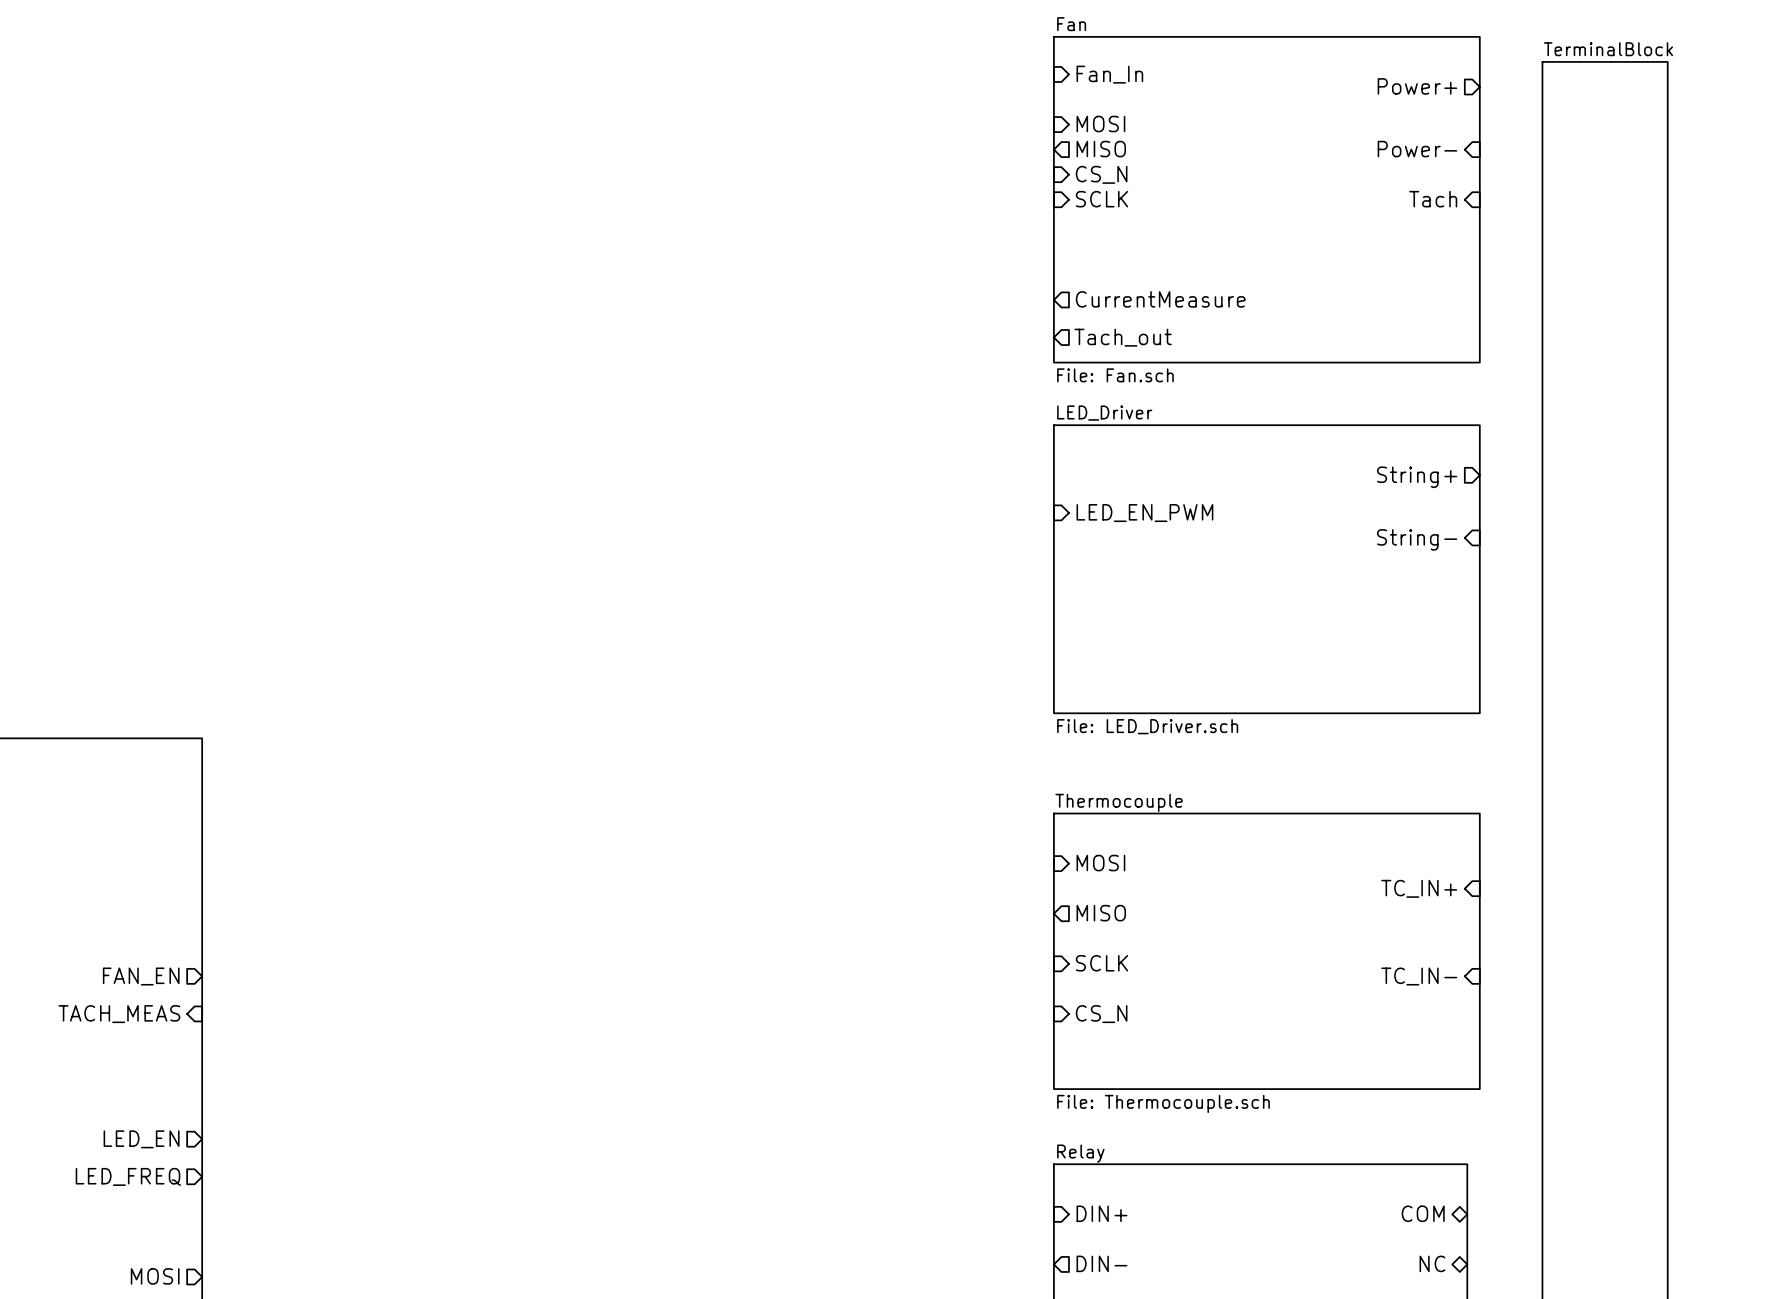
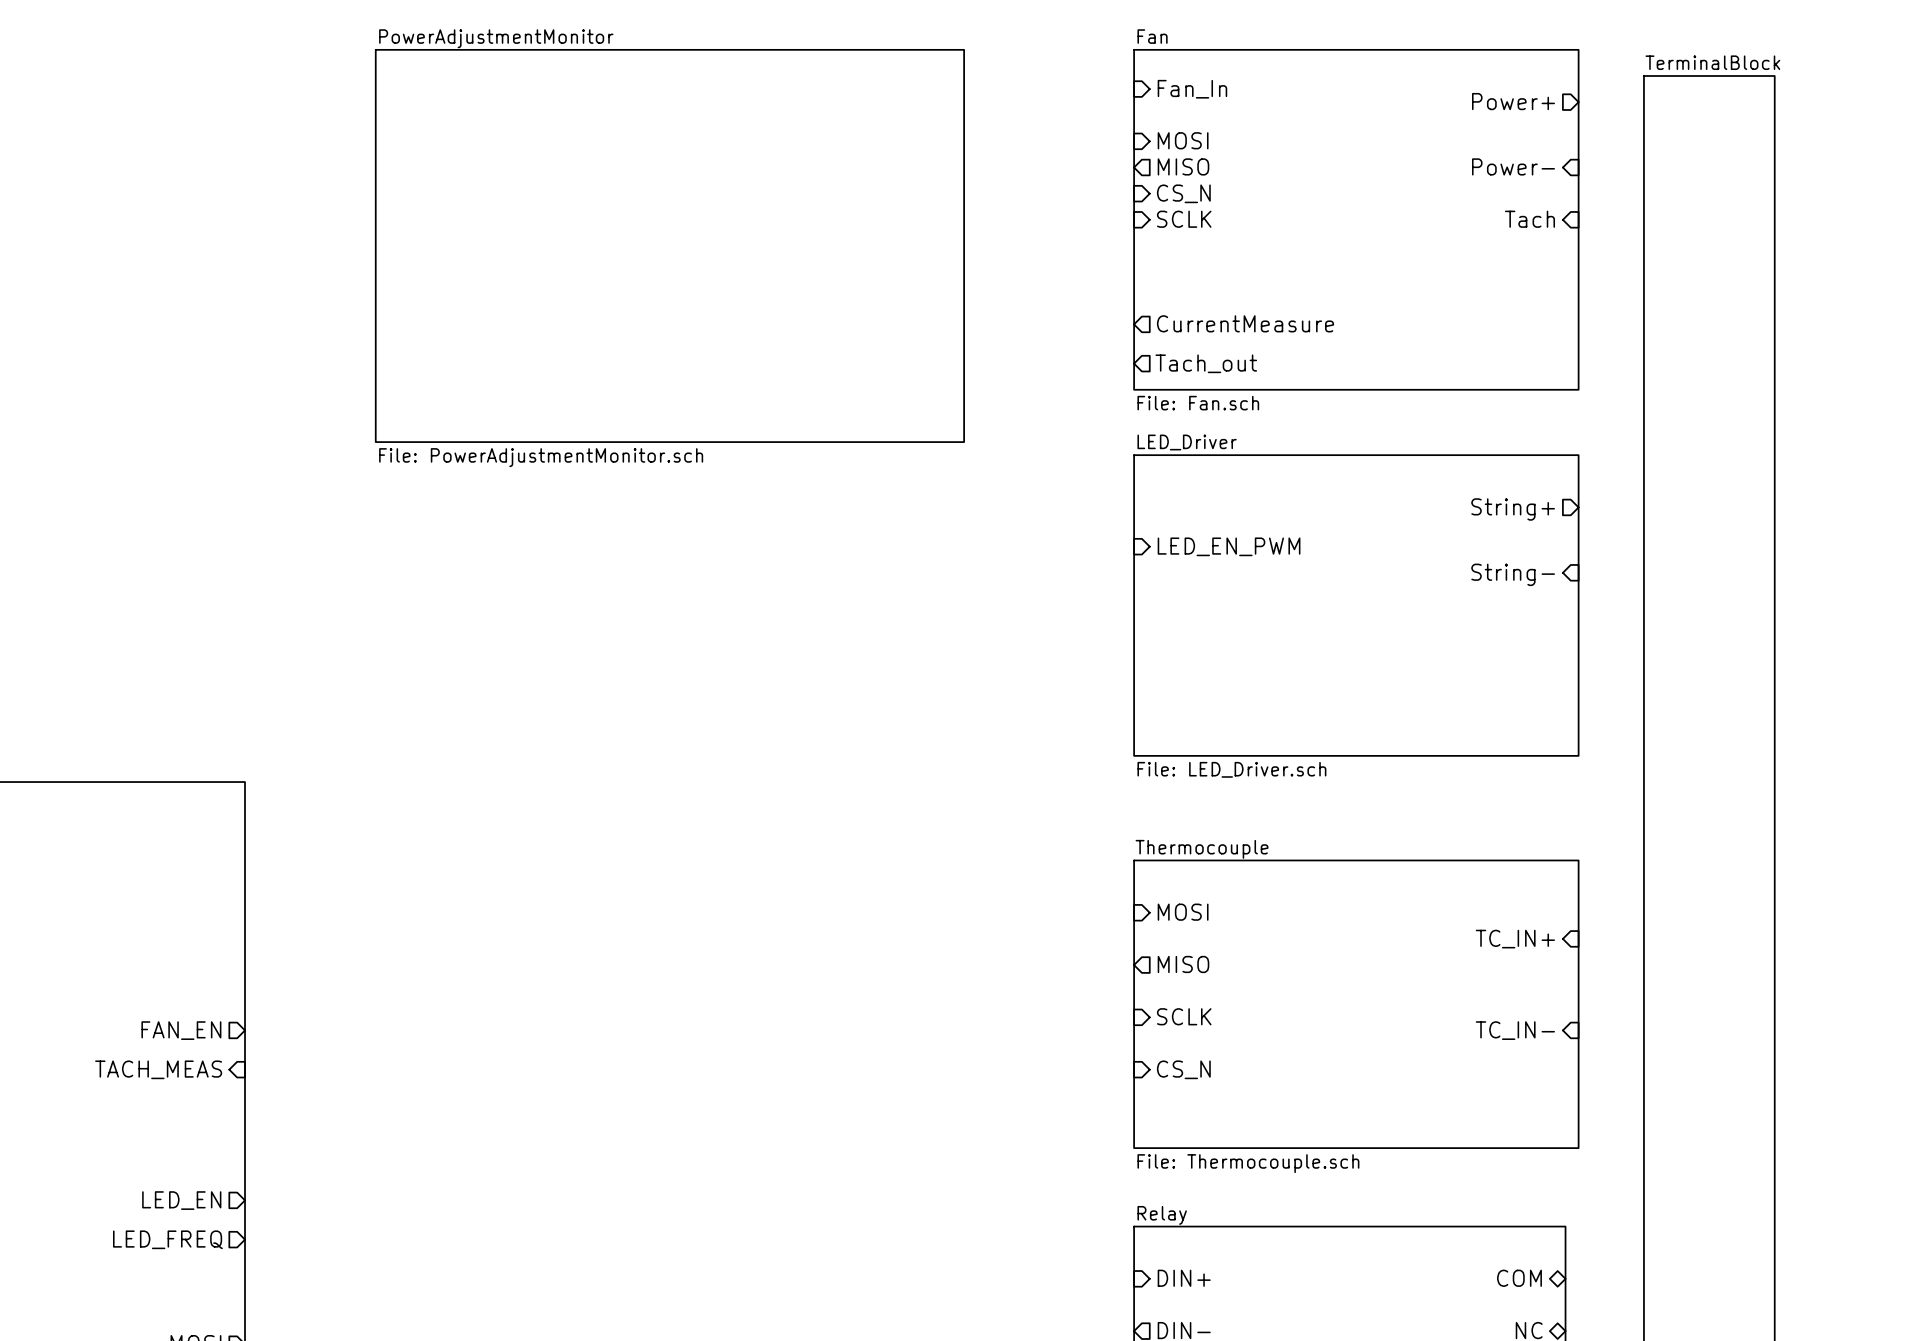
sheet PowerAdjustmentMonitor: none -> File: PowerAdjustmentMonitor.sch (669, 245)

